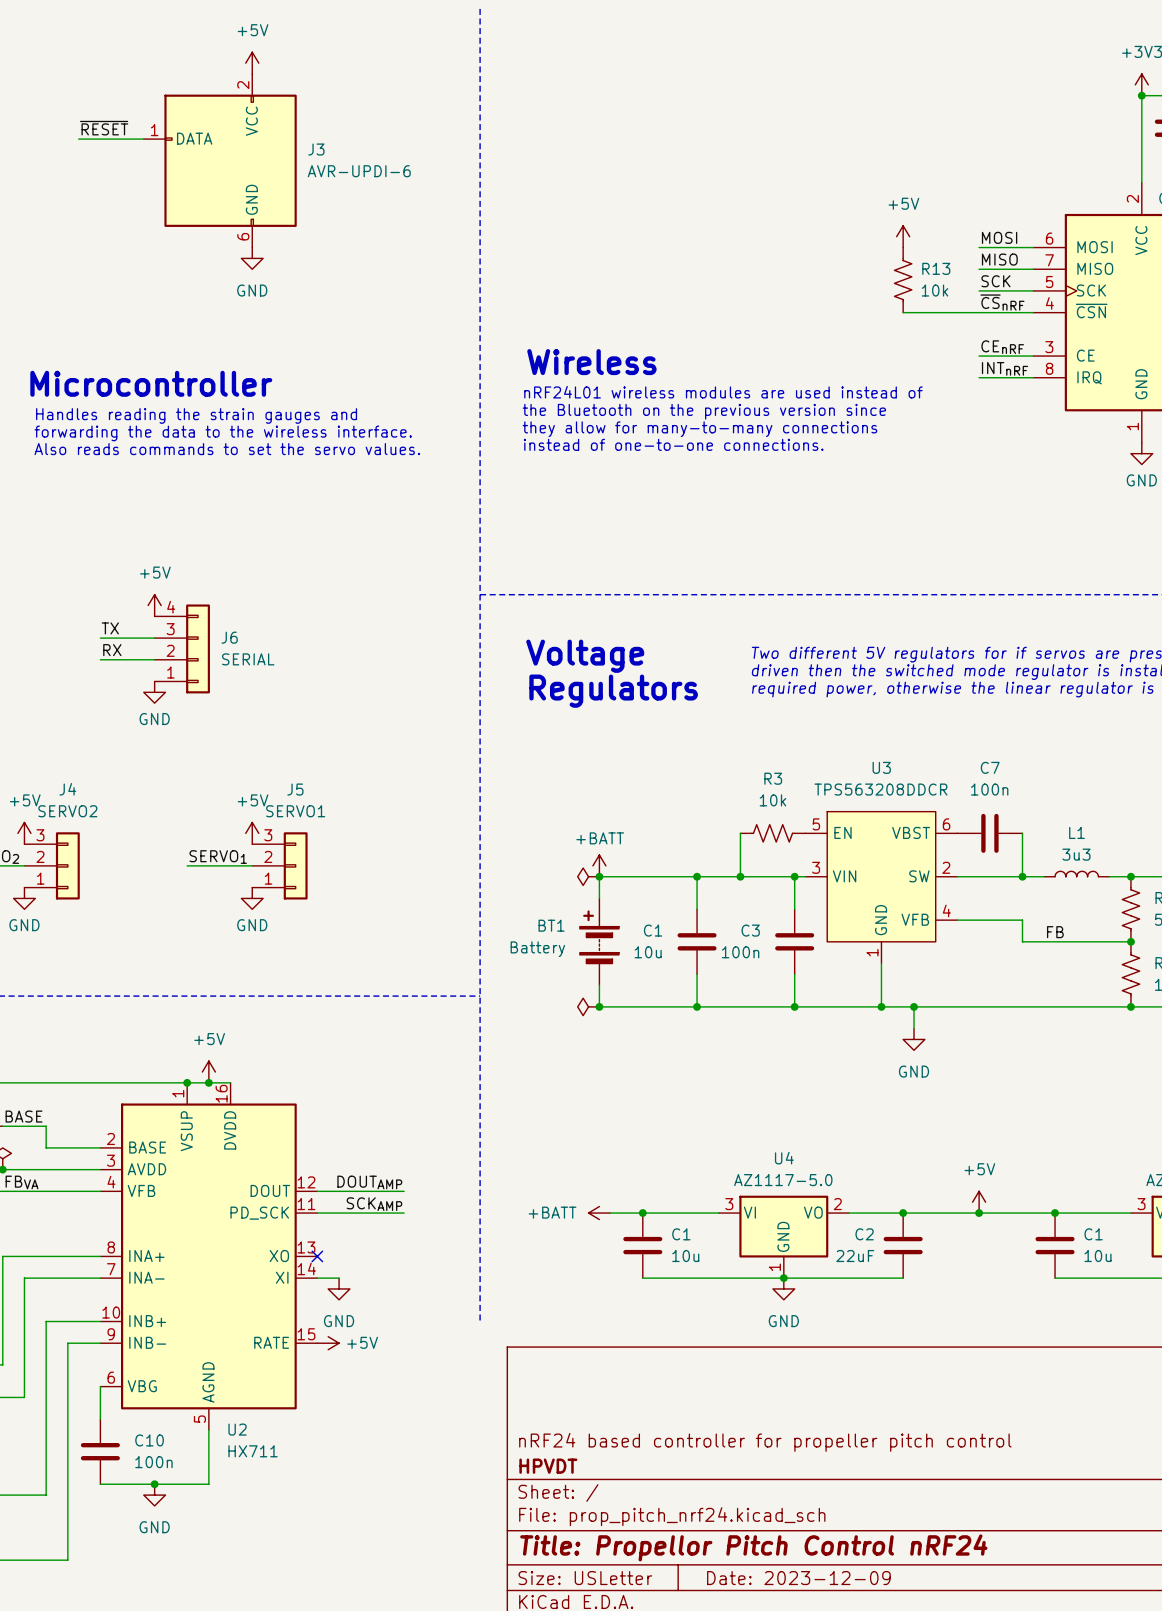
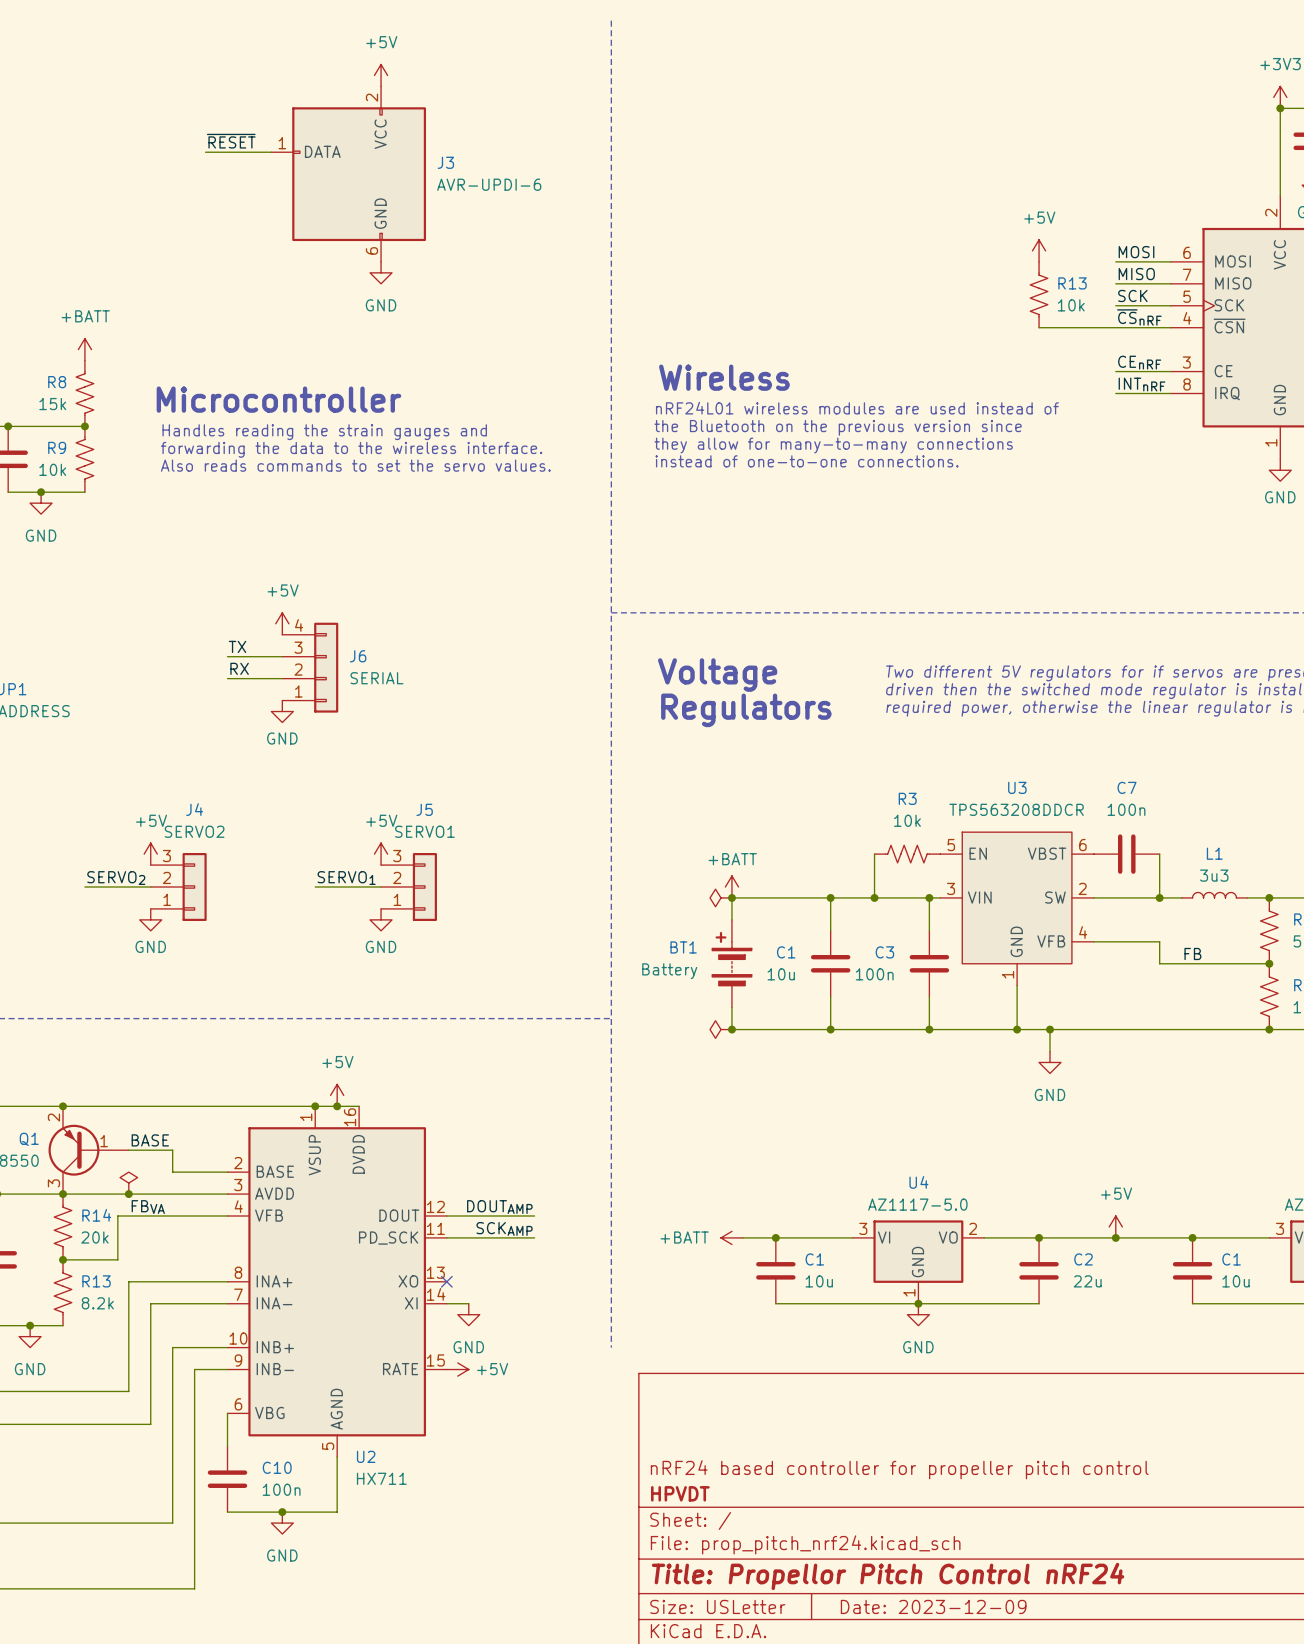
C2 name position: C2 (864, 1234) -> C2 (1083, 1259)
C2 value: 22uF (855, 1256) -> 22u (1087, 1281)

